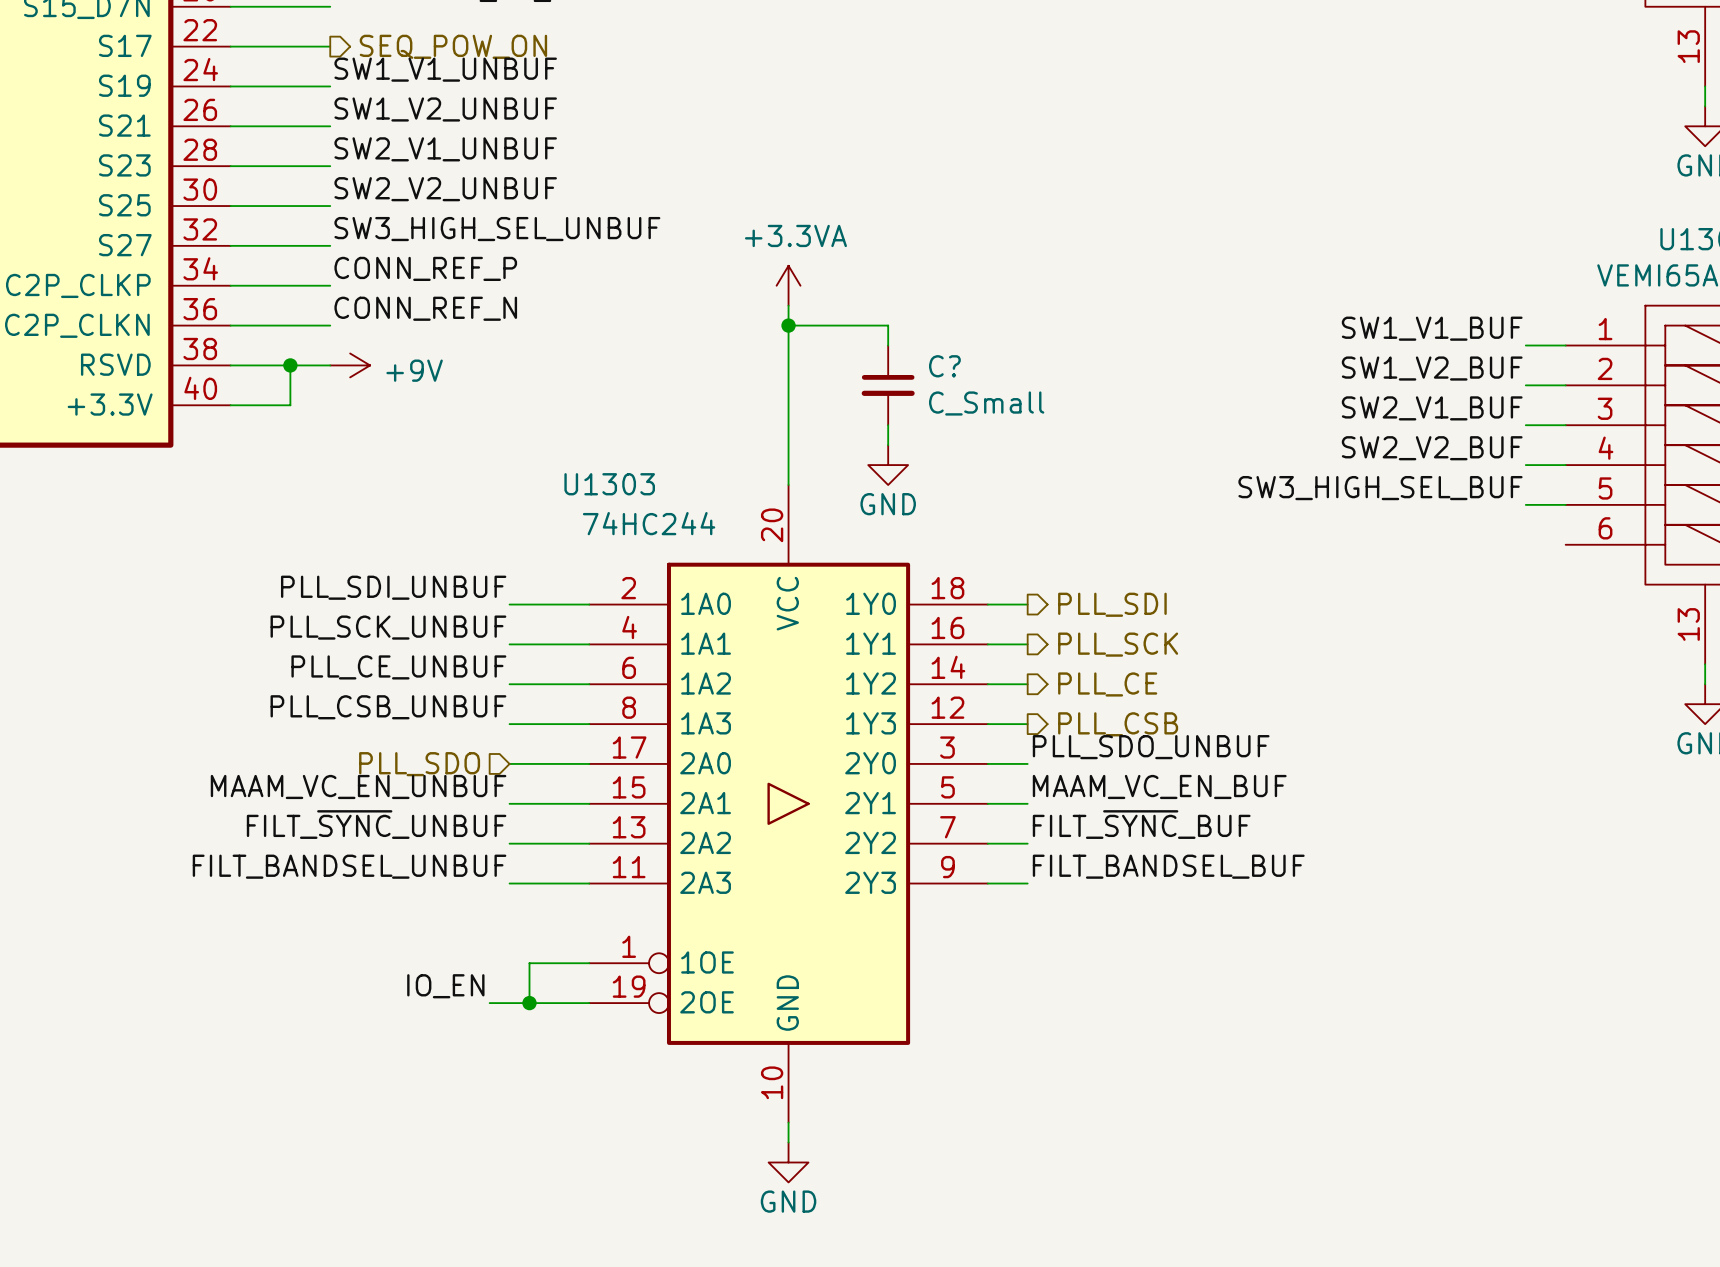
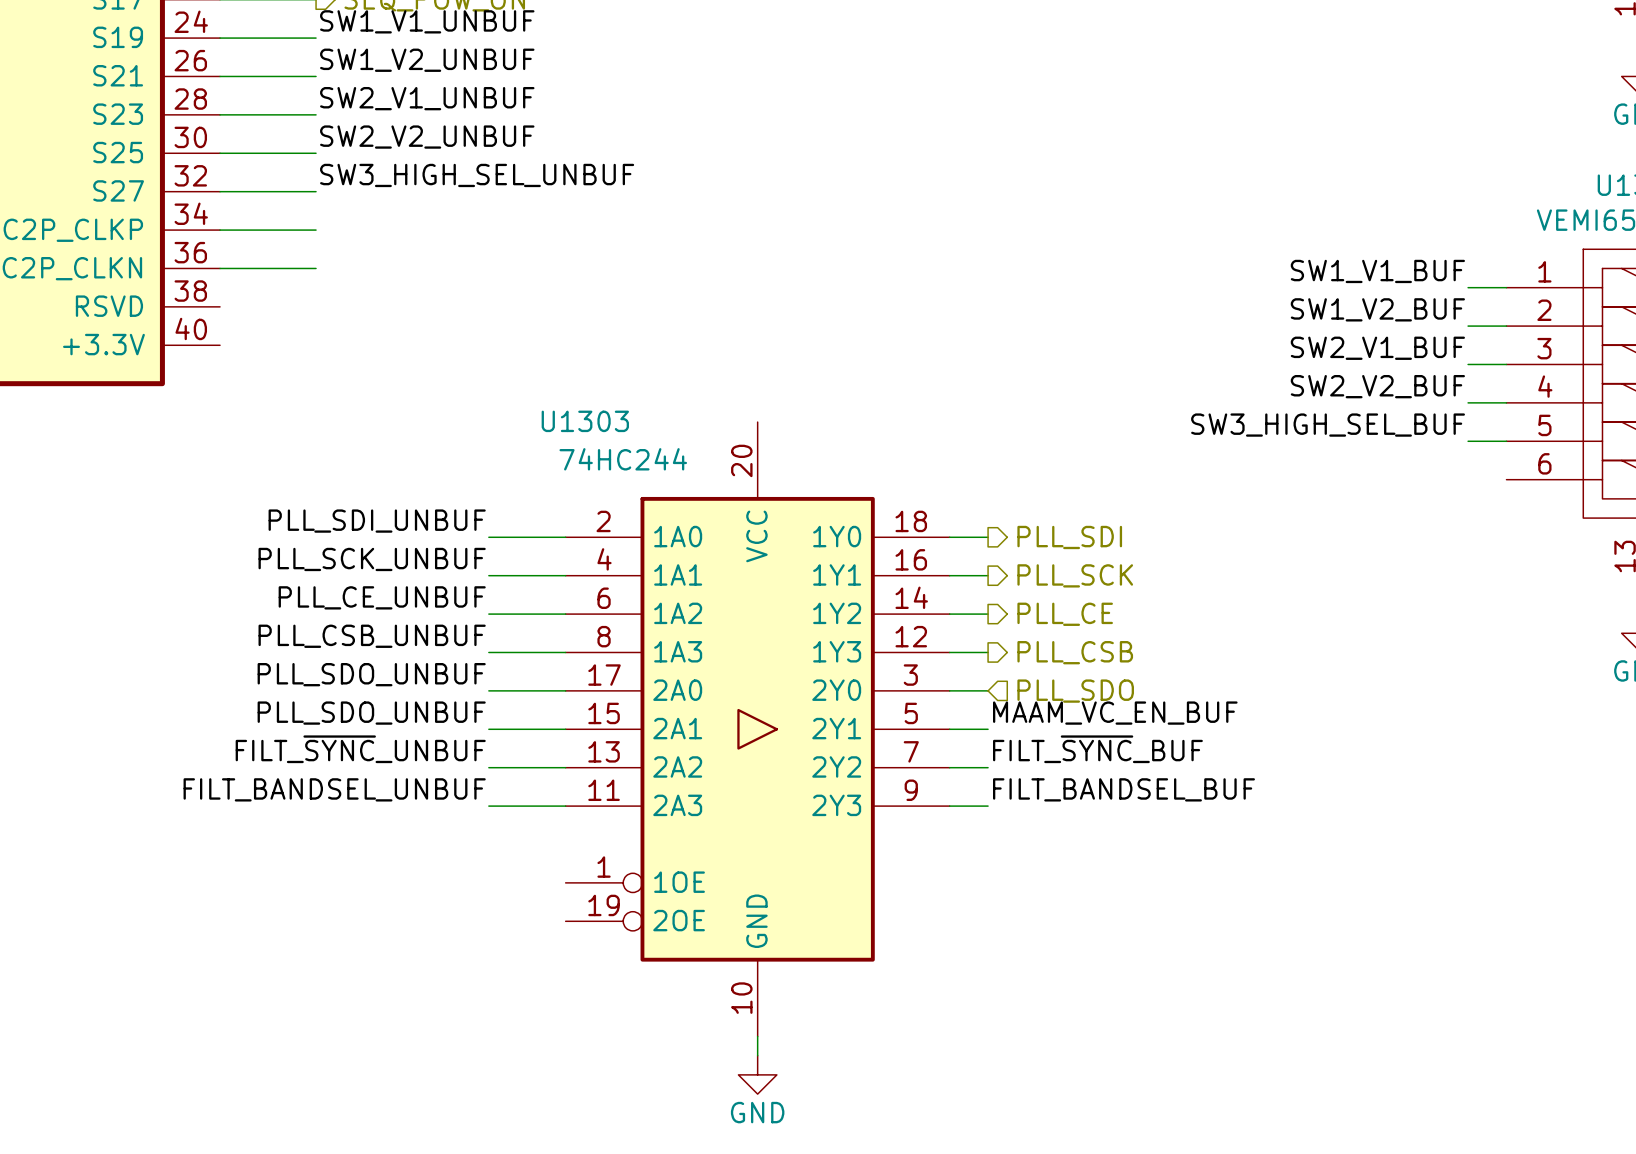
label: CONN_REF_P (425, 268) -> none
power symbol: +3.3VA (788, 285) -> none
wire: (788, 305) (788, 484) -> none
label: CONN_REF_N (425, 308) -> none
wire: (788, 325) (888, 325) (888, 345) -> none
junction: (788, 325) -> none
wire: (230, 365) (330, 365) -> none
wire: (290, 365) (290, 405) (230, 405) -> none
junction: (290, 365) -> none
power symbol: +9V (350, 365) -> none
C?: C_Small (888, 385) -> none
wire: (888, 425) (888, 445) -> none
power symbol: GND (888, 465) -> none
label: none -> PLL_SDO_UNBUF (371, 674)
label: PLL_SDO_UNBUF (1151, 747) -> none
hierarchical label: PLL_SDO (419, 764) -> none
hierarchical label: none -> PLL_SDO (1075, 691)
label: MAAM_VC_EN_UNBUF (358, 786) -> PLL_SDO_UNBUF (371, 713)
wire: (589, 963) (529, 963) (529, 1003) -> none
label: IO_EN (445, 986) -> none
wire: (489, 1003) (589, 1003) -> none
junction: (529, 1003) -> none

